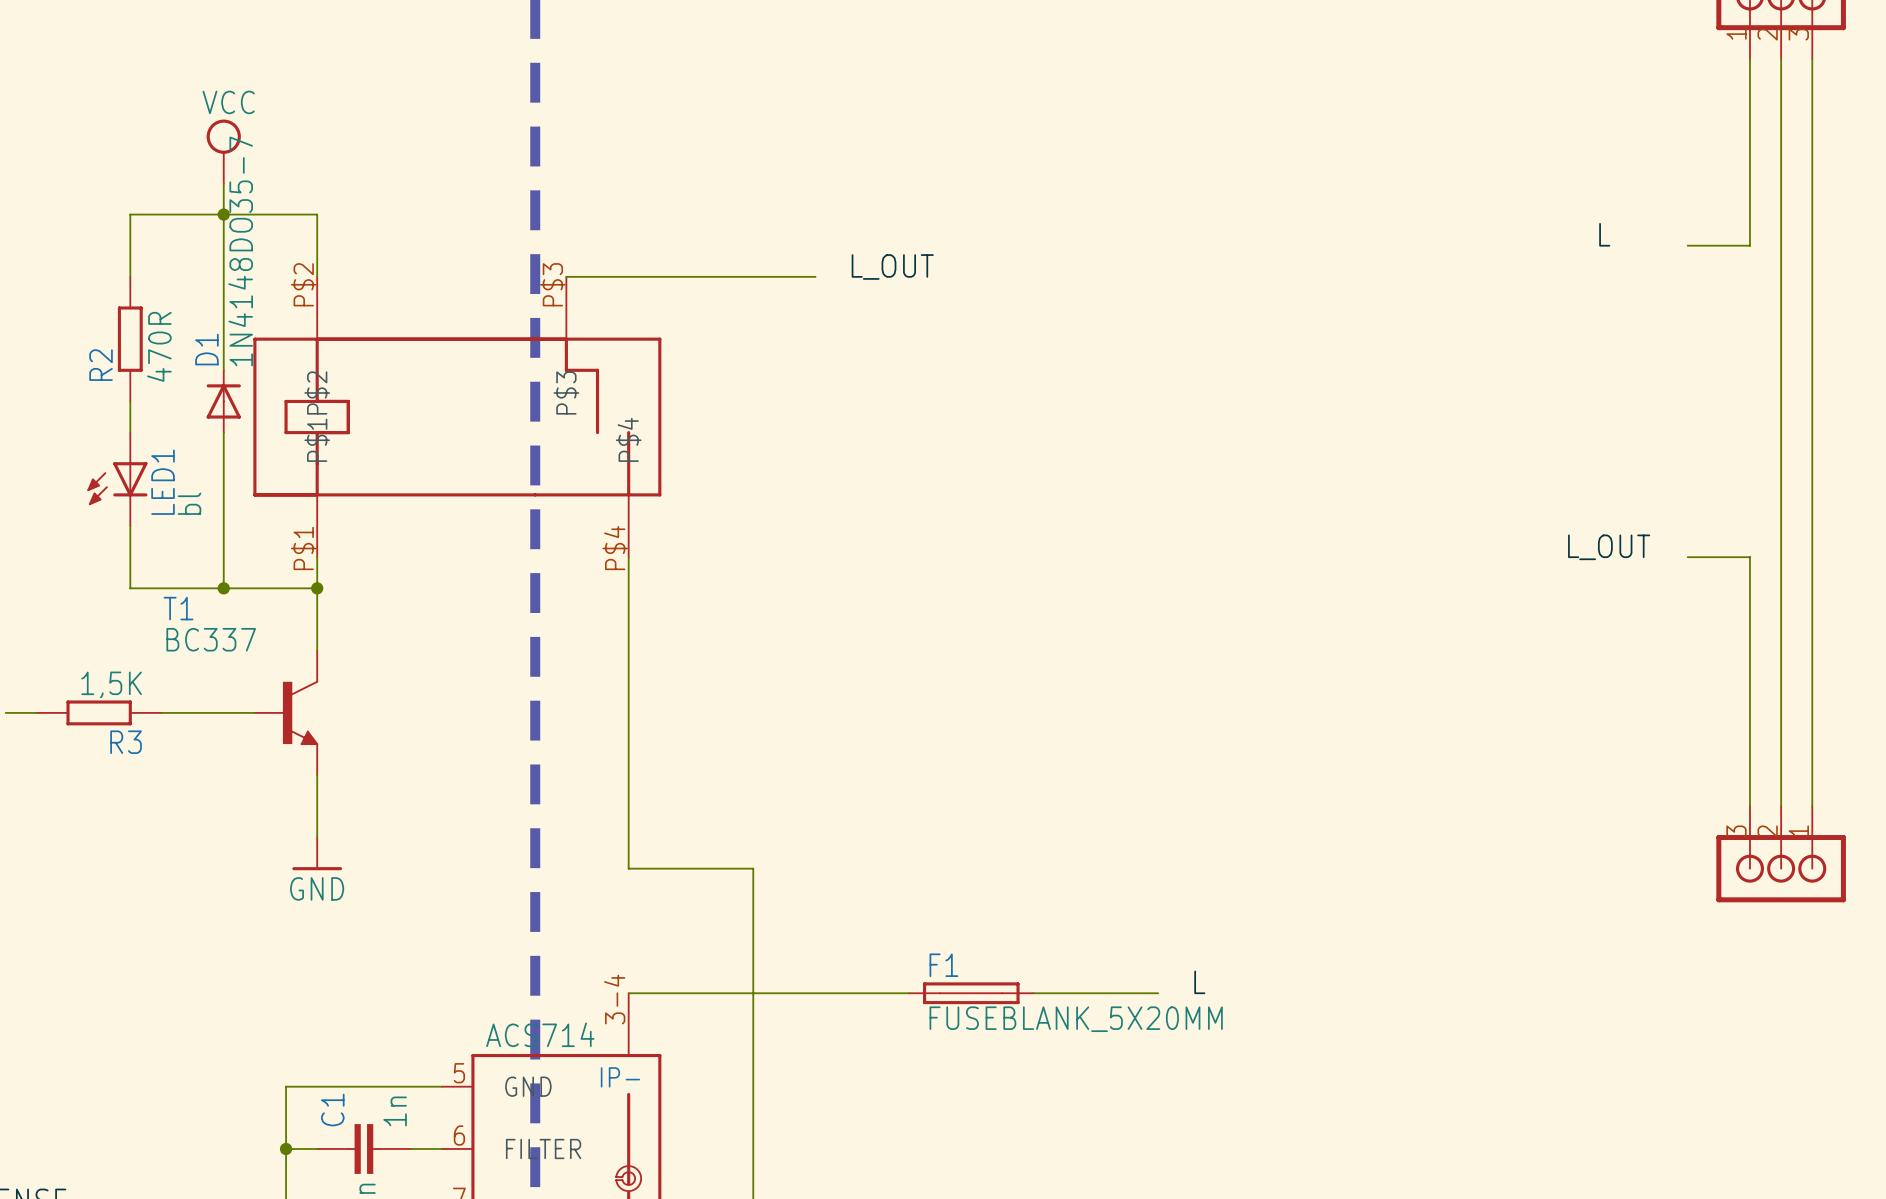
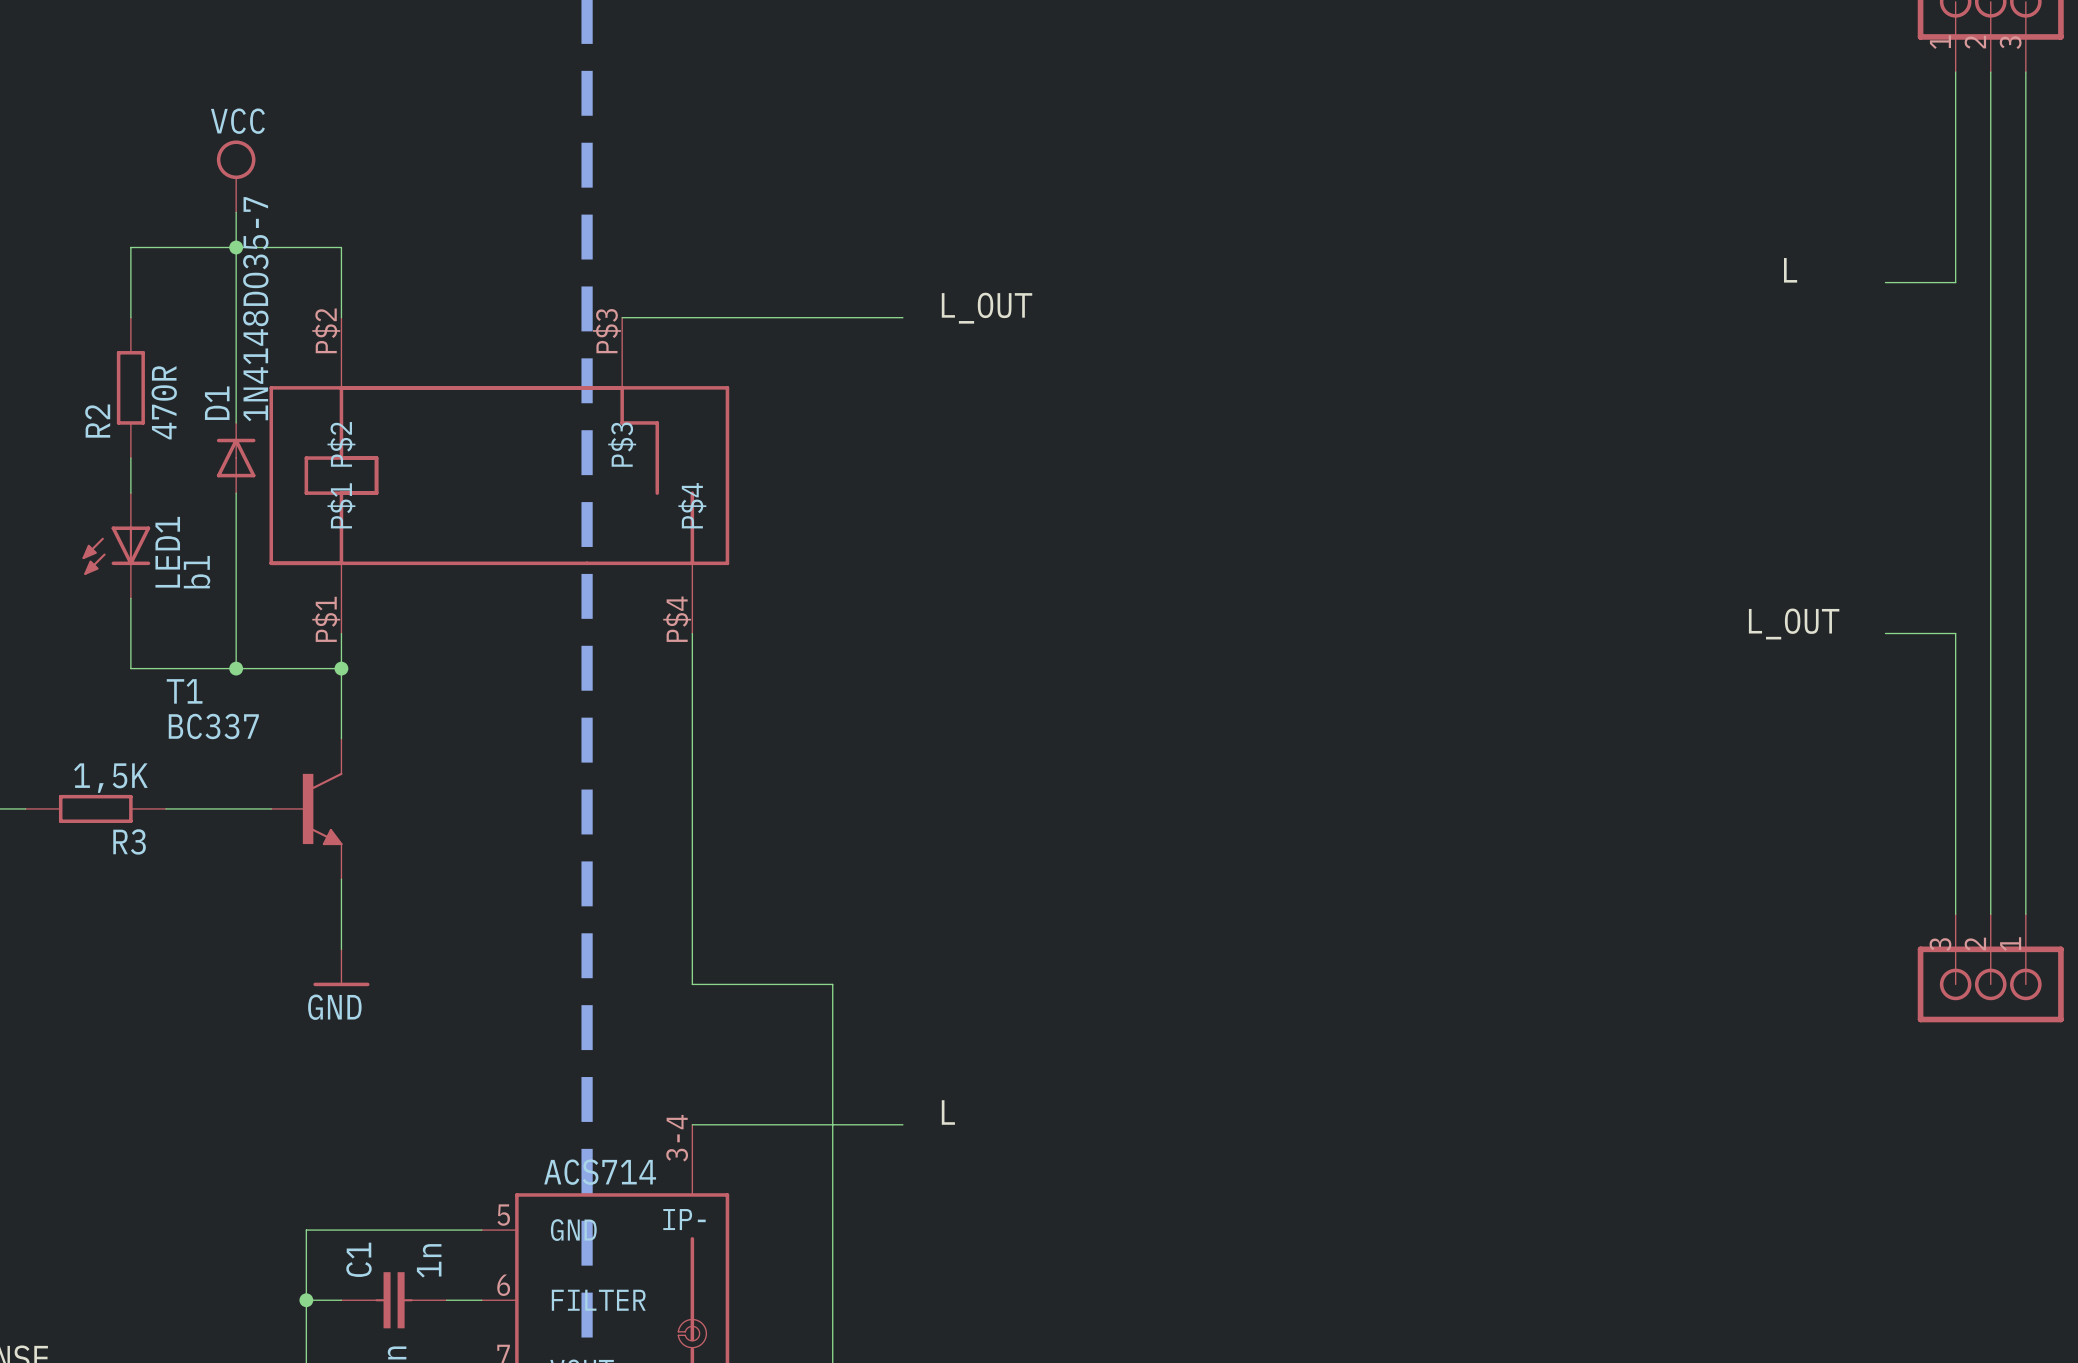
label: none -> L (948, 1112)
label: L (1199, 982) -> none
wire: (815, 993) (909, 993) -> none
F1: FUSEBLANK_5X20MM (971, 993) -> none
wire: (1033, 993) (1158, 993) -> none

